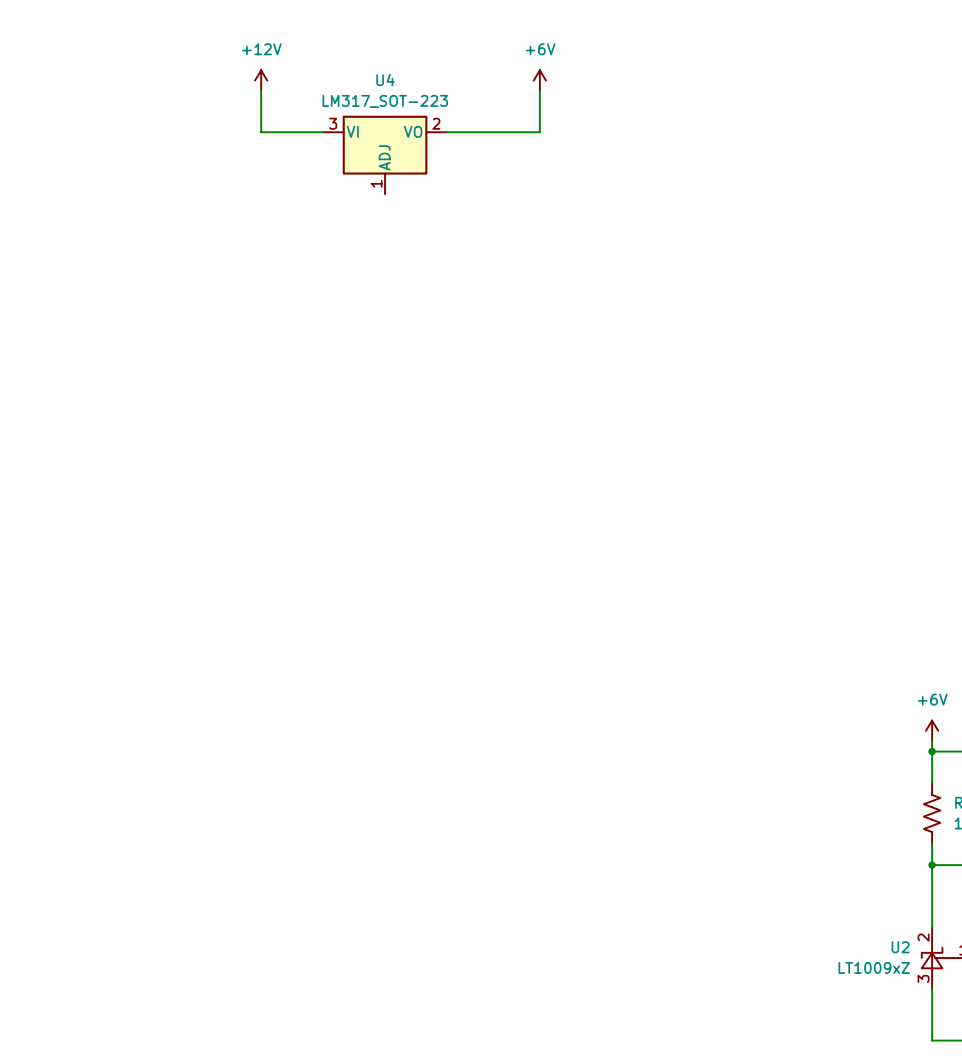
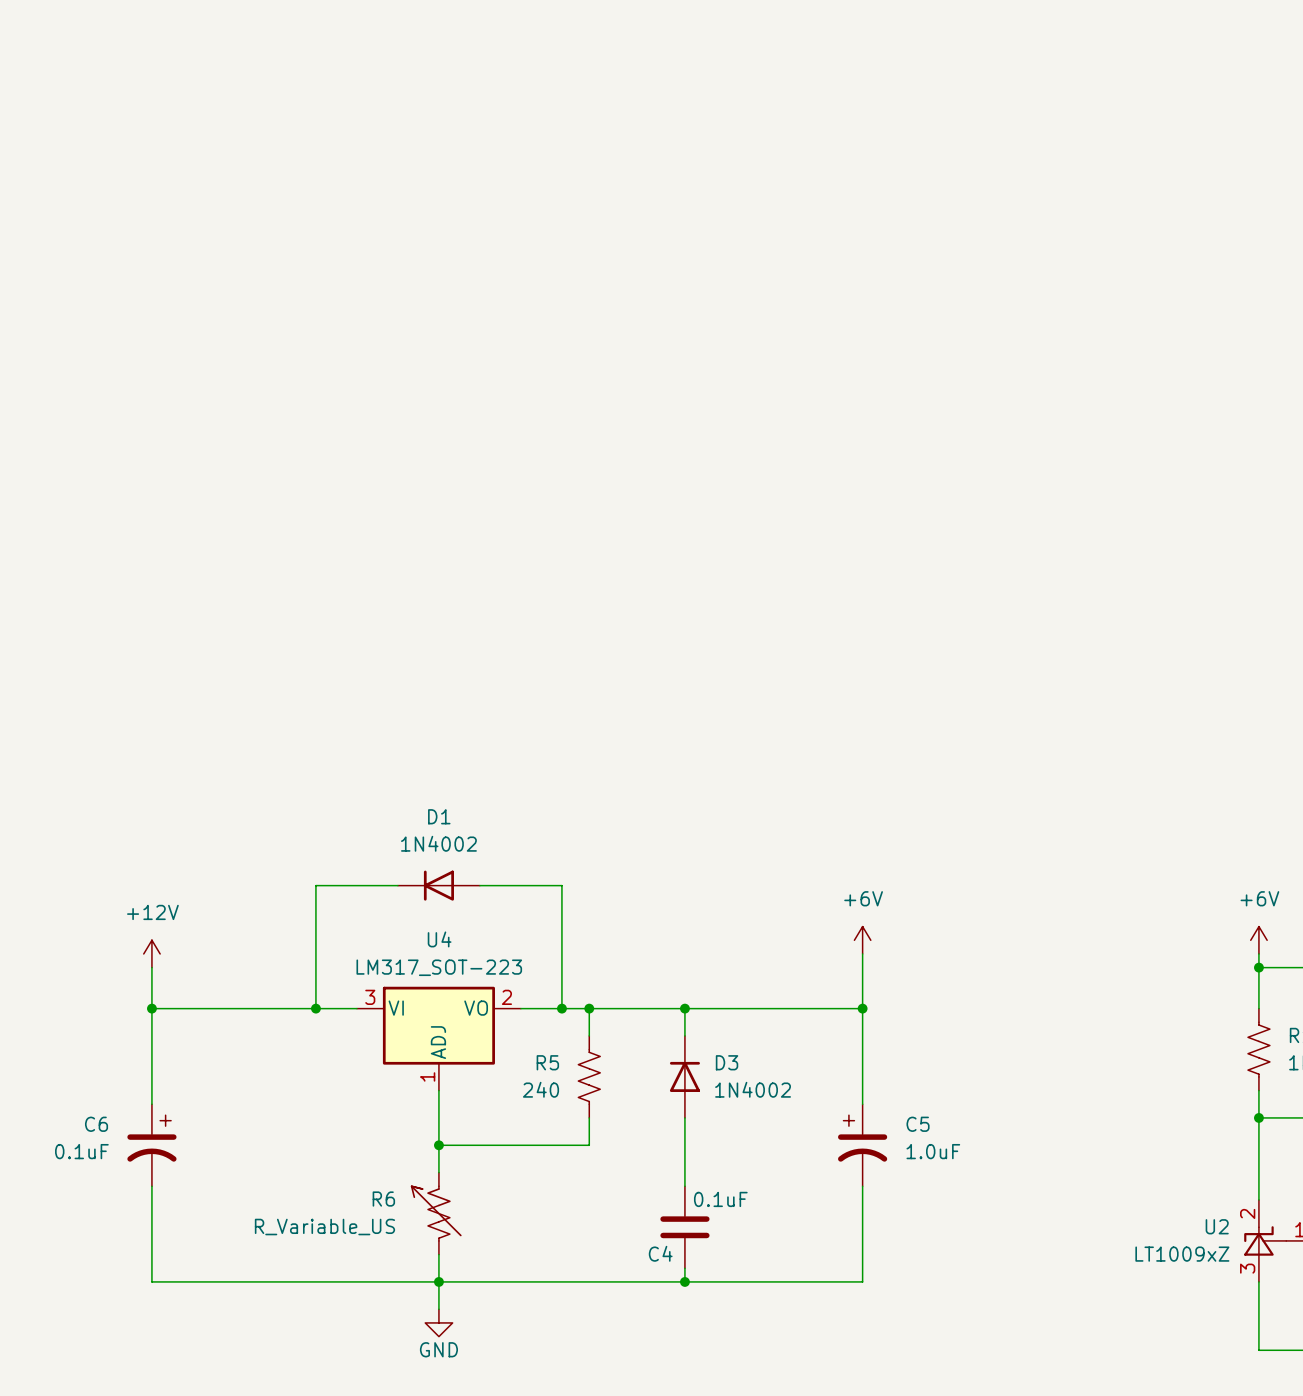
power symbol: +12V (261, 80) -> none
power symbol: +6V (539, 80) -> none
wire: (261, 90) (261, 132) (323, 132) -> none
wire: (539, 90) (539, 132) (446, 132) -> none
U4 position: (385, 154) -> (438, 1038)
wire: none -> (397, 885) (315, 885) (315, 1008)
D1: none -> 1N4002 (438, 885)
wire: none -> (479, 885) (561, 885) (561, 1008)
power symbol: none -> +6V (862, 940)
power symbol: none -> +12V (151, 953)
wire: none -> (862, 953) (862, 1104)
wire: none -> (151, 967) (151, 1104)
wire: none -> (151, 1008) (356, 1008)
junction: none -> (151, 1008)
junction: none -> (315, 1008)
wire: none -> (520, 1008) (862, 1008)
junction: none -> (561, 1008)
wire: none -> (589, 1008) (589, 1035)
junction: none -> (589, 1008)
wire: none -> (684, 1008) (684, 1035)
junction: none -> (684, 1008)
junction: none -> (862, 1008)
R5: none -> 240 (589, 1076)
D3: none -> 1N4002 (684, 1076)
wire: none -> (438, 1090) (438, 1172)
wire: none -> (589, 1117) (589, 1145) (438, 1145)
wire: none -> (684, 1117) (684, 1186)
C6: none -> 0.1uF (151, 1145)
junction: none -> (438, 1145)
C5: none -> 1.0uF (862, 1145)
wire: none -> (151, 1186) (151, 1281) (862, 1281) (862, 1186)
R6: none -> R_Variable_US (436, 1213)
C4: none -> 0.1uF (684, 1227)
wire: none -> (438, 1254) (438, 1309)
wire: none -> (684, 1268) (684, 1281)
junction: none -> (438, 1281)
junction: none -> (684, 1281)
power symbol: none -> GND (438, 1322)

